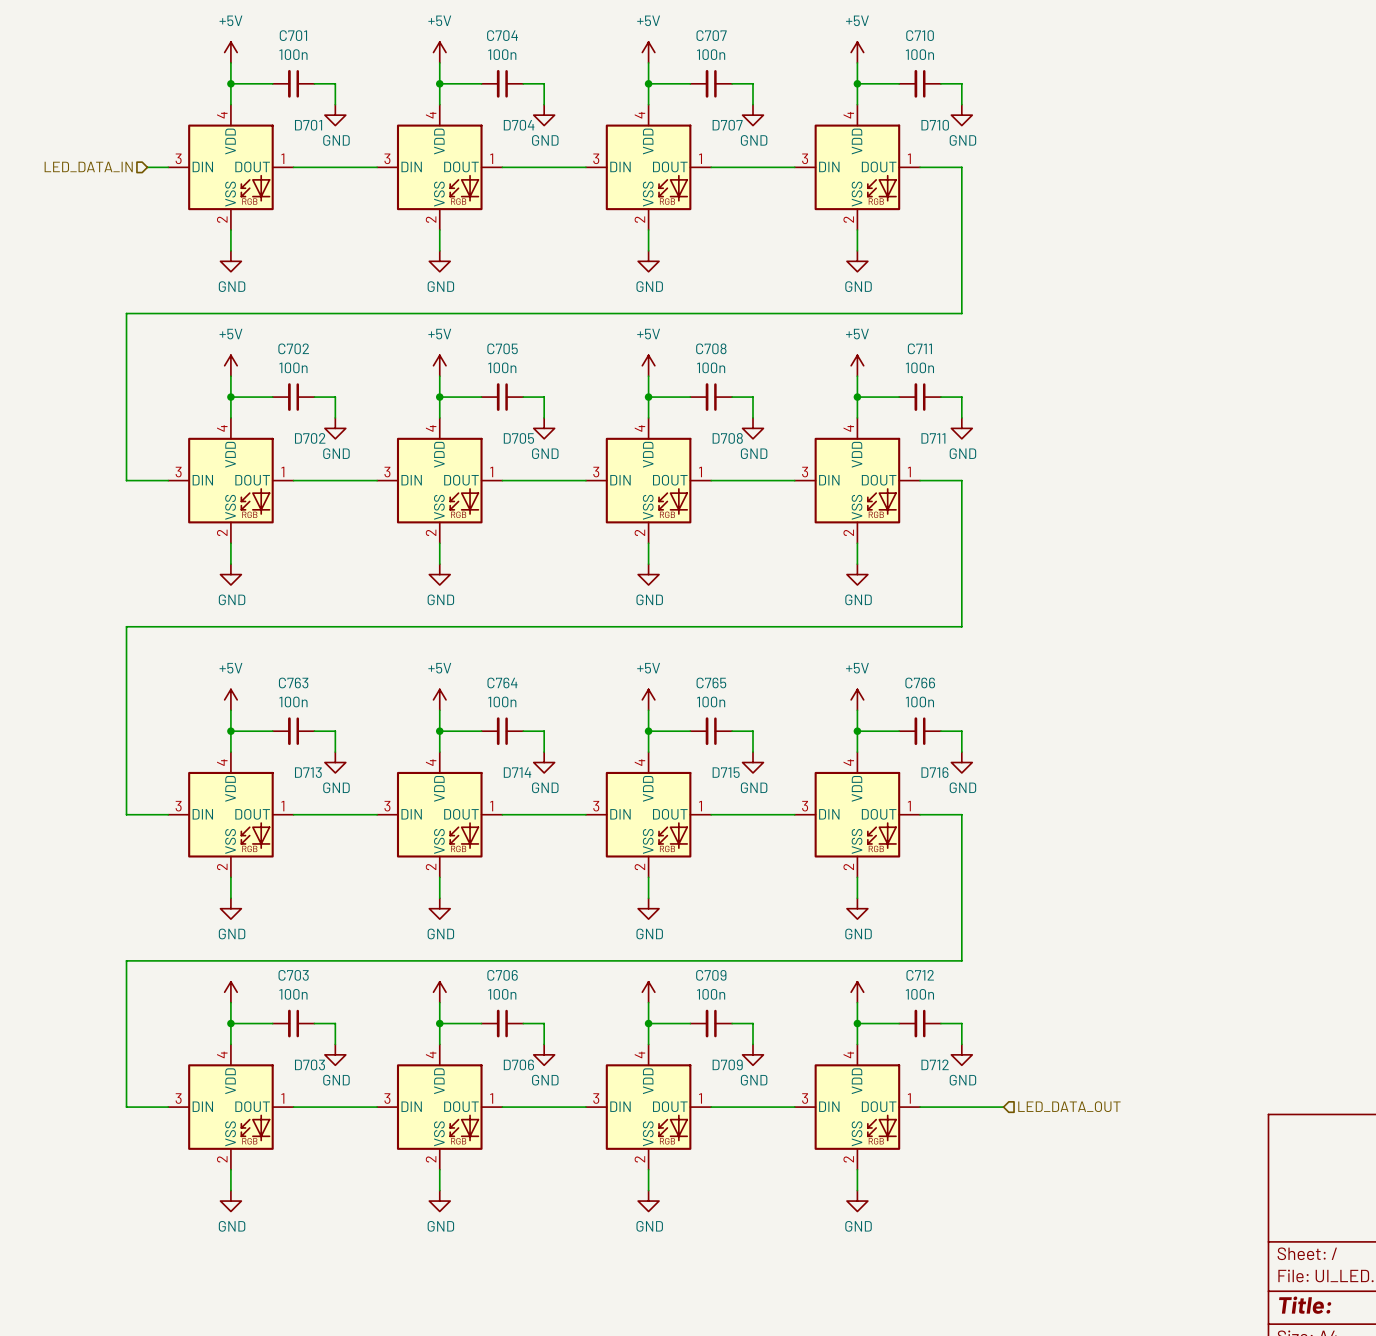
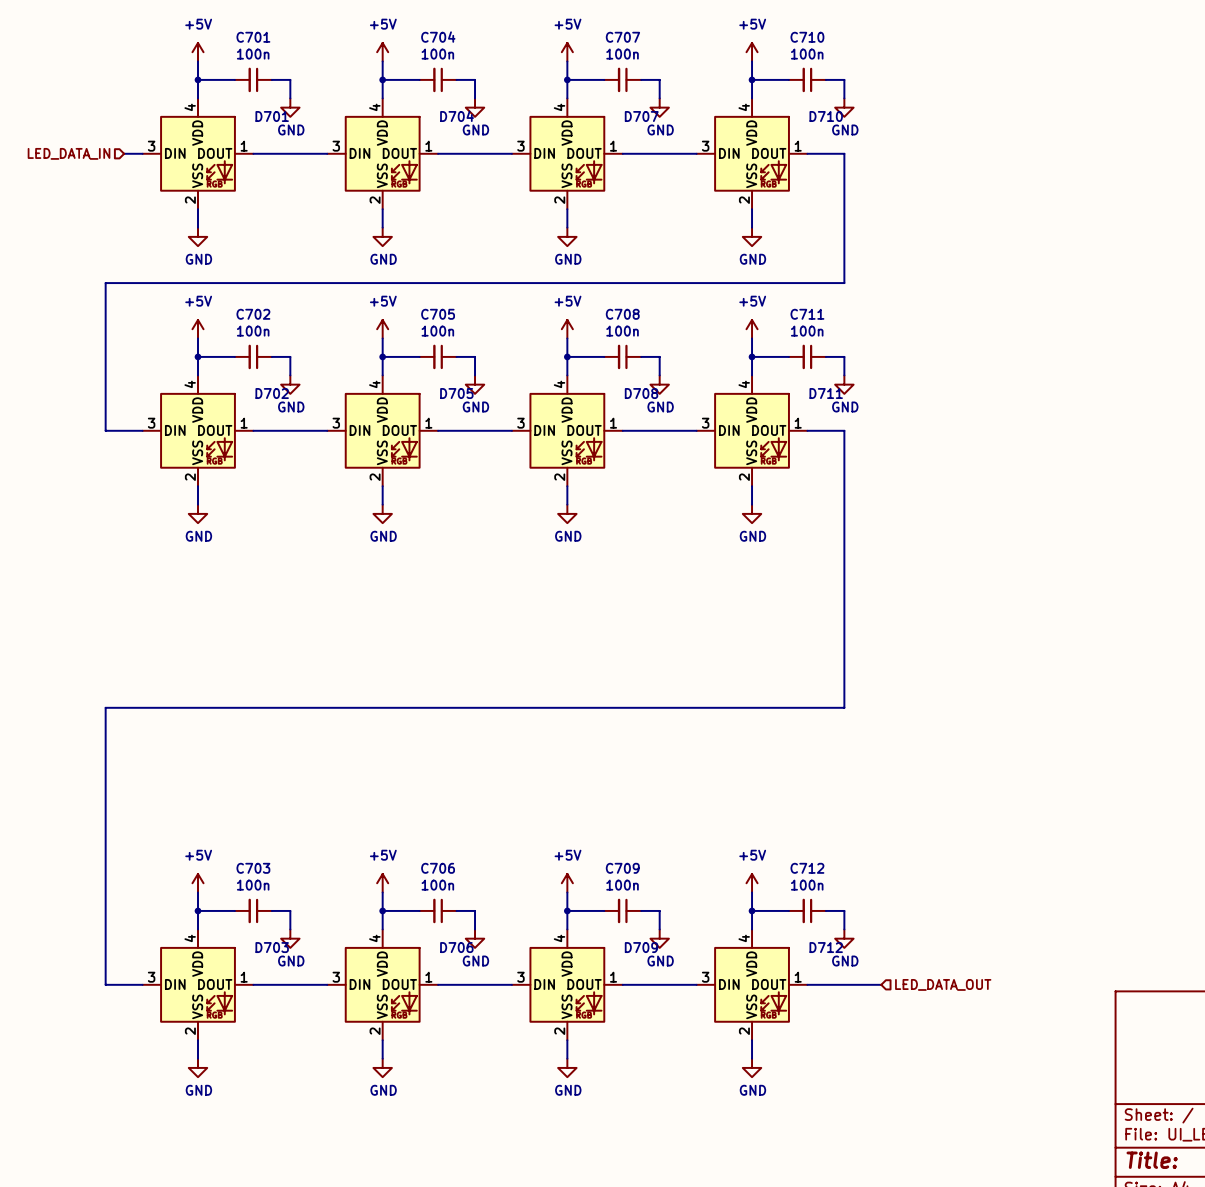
wire: (961, 626) (126, 626) (126, 793) -> (844, 670) (844, 707) (105, 707)
power symbol: +5V (230, 699) -> none
power symbol: +5V (439, 699) -> none
power symbol: +5V (648, 699) -> none
power symbol: +5V (857, 699) -> none
wire: (230, 710) (230, 752) -> none
wire: (439, 710) (439, 752) -> none
wire: (648, 710) (648, 752) -> none
wire: (857, 710) (857, 752) -> none
wire: (230, 731) (272, 731) -> none
junction: (230, 731) -> none
C763: 100n (293, 731) -> none
wire: (314, 731) (335, 731) (335, 752) -> none
wire: (439, 731) (481, 731) -> none
junction: (439, 731) -> none
C764: 100n (502, 731) -> none
wire: (523, 731) (544, 731) (544, 752) -> none
wire: (648, 731) (690, 731) -> none
junction: (648, 731) -> none
C765: 100n (711, 731) -> none
wire: (732, 731) (752, 731) (752, 752) -> none
wire: (857, 731) (899, 731) -> none
junction: (857, 731) -> none
C766: 100n (920, 731) -> none
wire: (940, 731) (961, 731) -> (844, 560) (844, 652)
power symbol: GND (335, 762) -> none
power symbol: GND (544, 762) -> none
power symbol: GND (752, 762) -> none
power symbol: GND (961, 762) -> none
wire: (126, 814) (168, 814) -> (105, 726) (105, 855)
D713: (230, 814) -> none
wire: (293, 814) (377, 814) -> none
D714: (439, 814) -> none
wire: (502, 814) (585, 814) -> none
D715: (648, 814) -> none
wire: (711, 814) (794, 814) -> none
D716: (857, 814) -> none
wire: (920, 814) (961, 814) (961, 960) (126, 960) -> none
wire: (230, 877) (230, 898) -> none
wire: (439, 877) (439, 898) -> none
wire: (648, 877) (648, 898) -> none
wire: (857, 877) (857, 898) -> none
power symbol: GND (230, 908) -> none
power symbol: GND (439, 908) -> none
power symbol: GND (648, 908) -> none
power symbol: GND (857, 908) -> none
power symbol text: none -> +5V (198, 855)
power symbol text: none -> +5V (383, 855)
power symbol text: none -> +5V (568, 855)
power symbol text: none -> +5V (752, 855)

